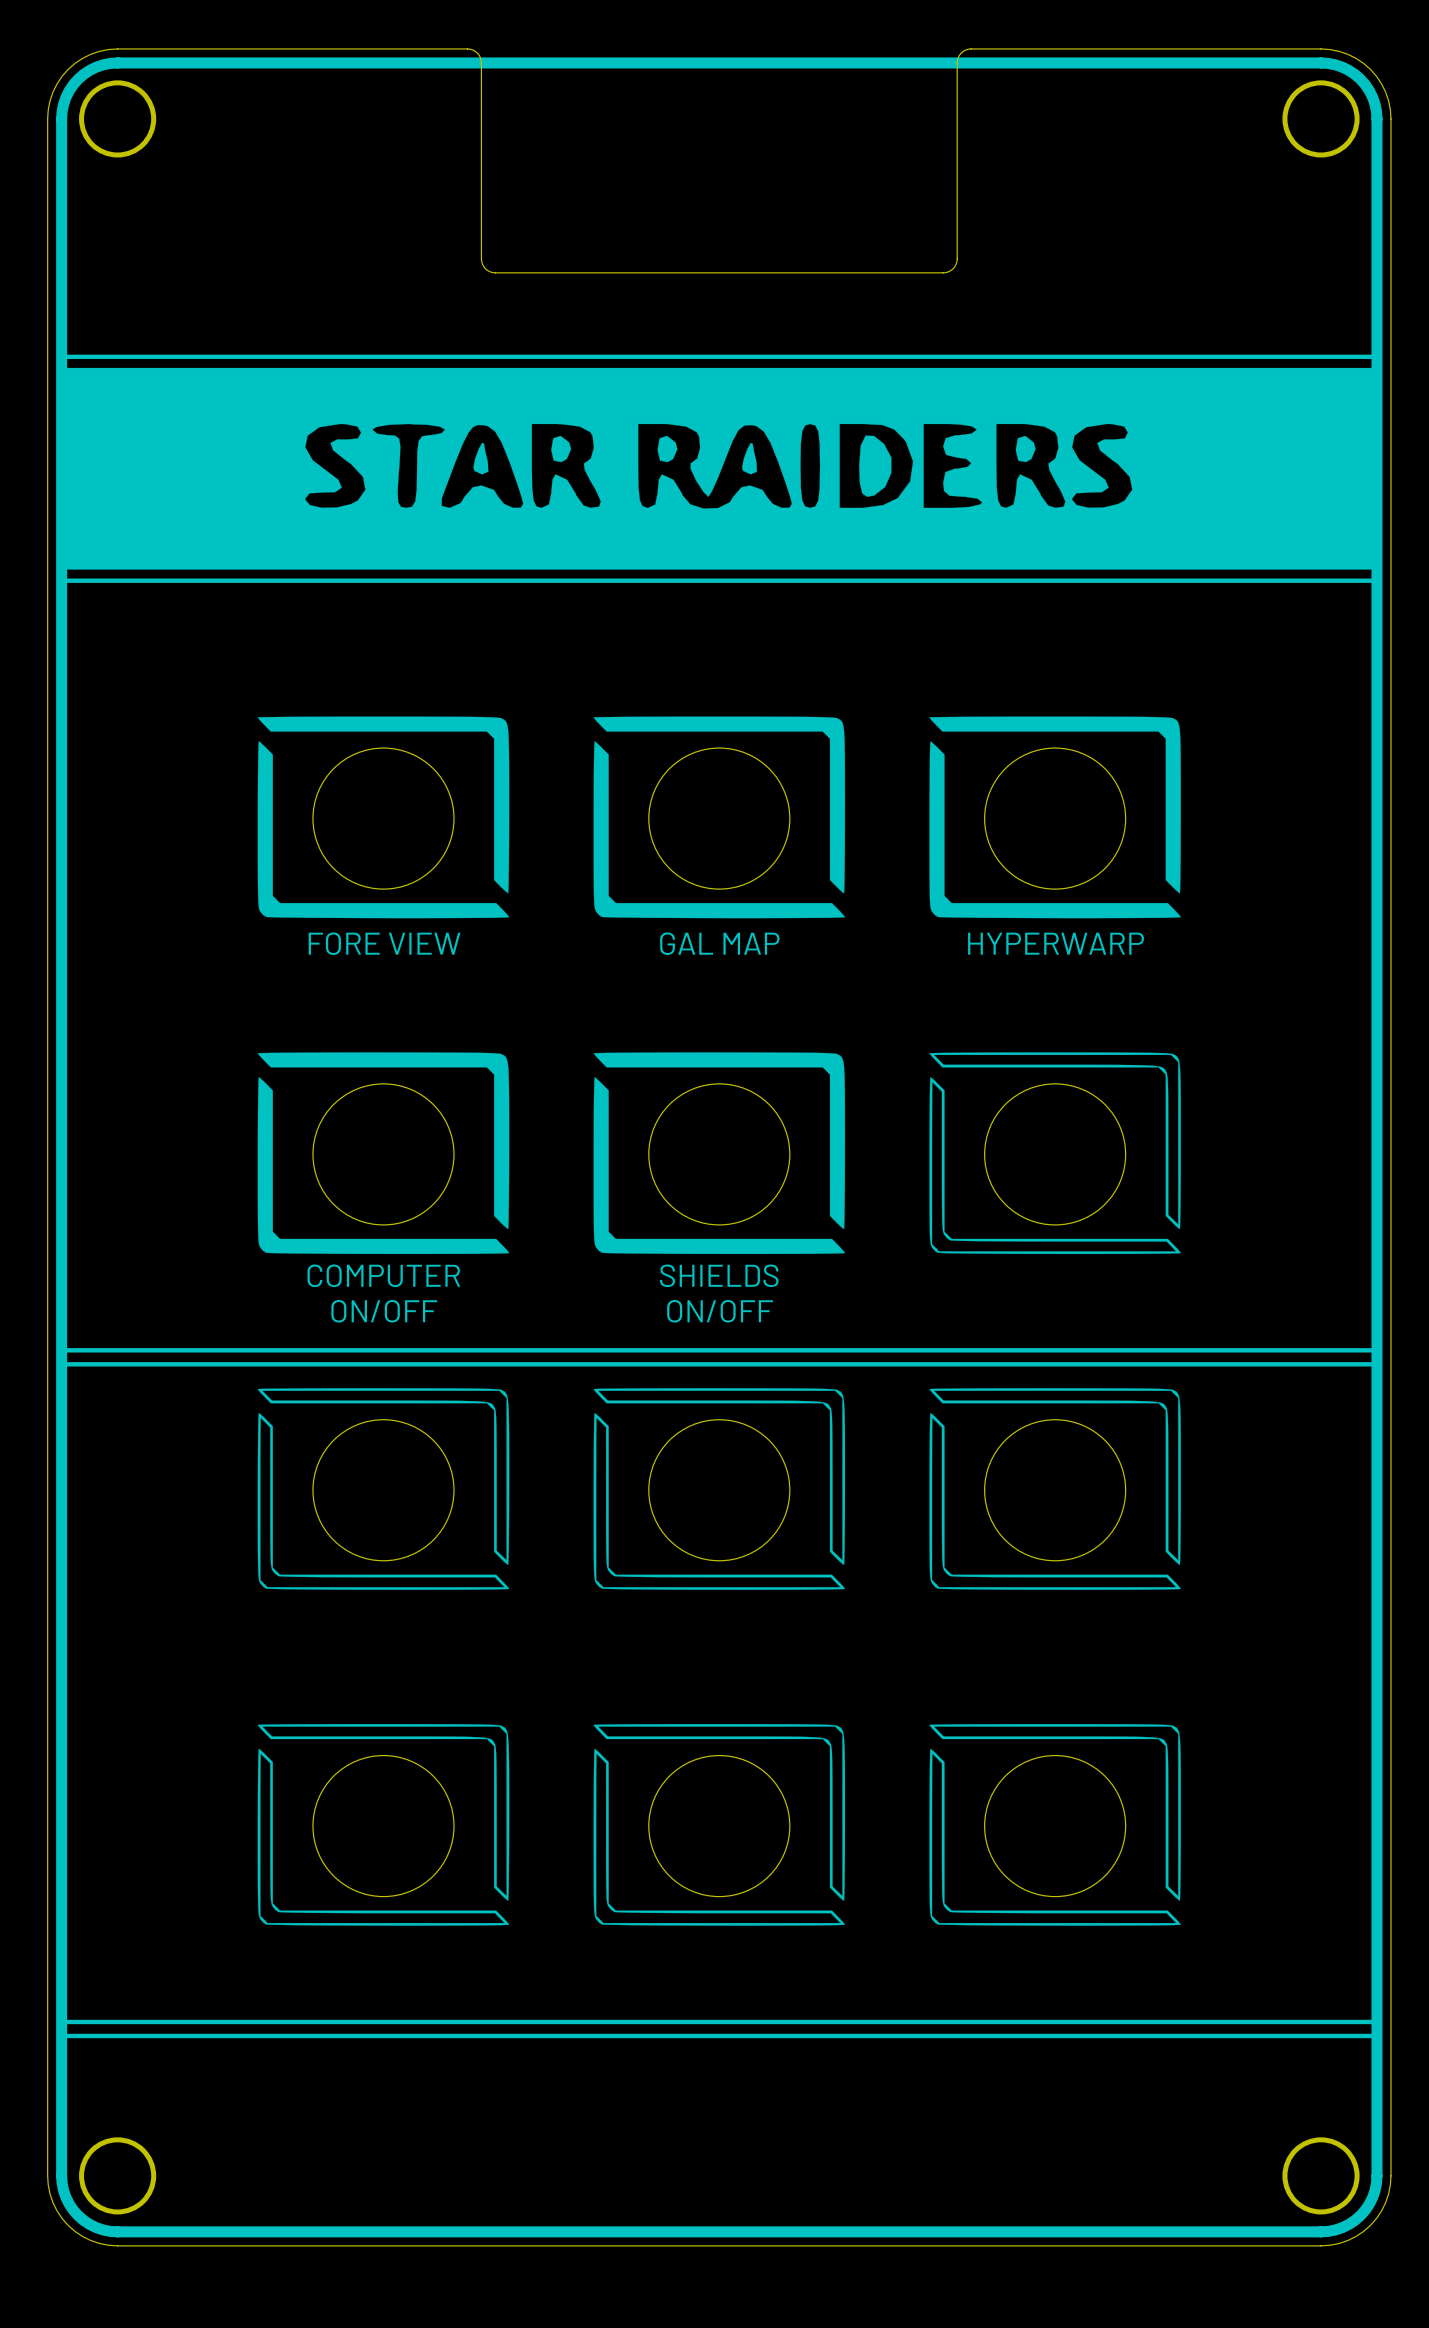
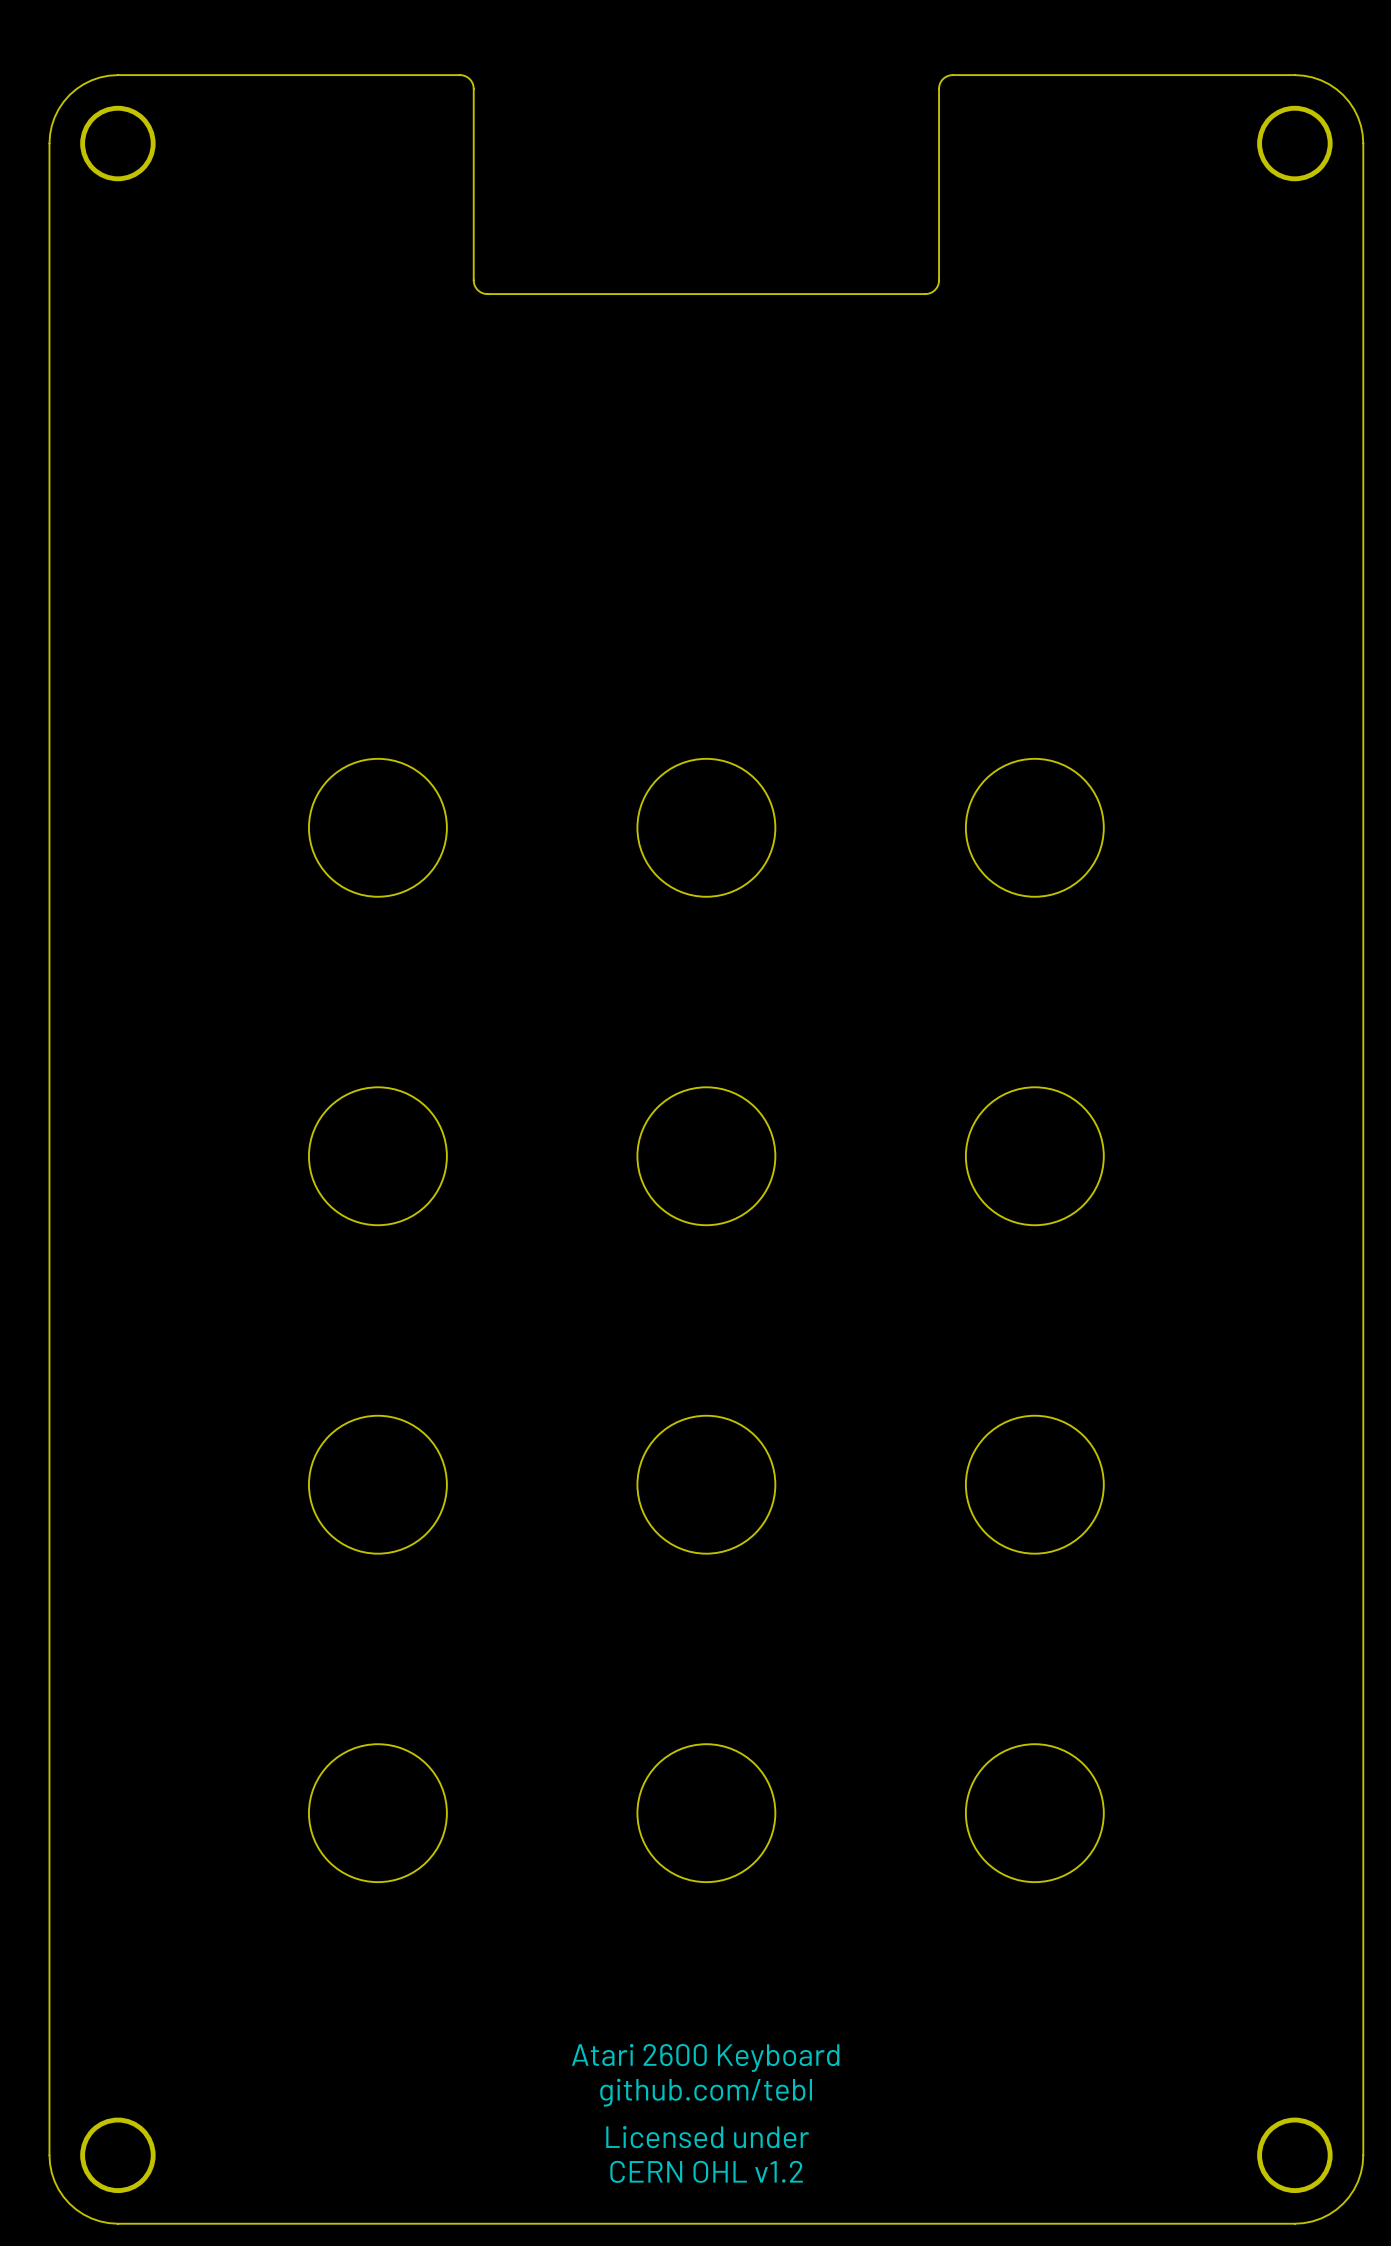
line: (1321, 62) (117, 62) (103, 64) (89, 70) (78, 79) (69, 90) (63, 104) (61, 118) (61, 2175) (63, 2190) (69, 2203) (78, 2215) (89, 2224) (103, 2229) (117, 2231) (1321, 2231) (1335, 2229) (1349, 2224) (1360, 2215) (1369, 2203) (1375, 2190) (1376, 2175) (1376, 118) (1372, 97) (1360, 79) (1342, 67) (1321, 62) -> none
line: (1376, 356) (61, 356) -> none
drawing: [64, 367, 1375, 570] -> none
line: (1376, 580) (61, 580) -> none
drawing: [257, 716, 510, 919] -> none
drawing: [593, 716, 846, 919] -> none
drawing: [929, 716, 1181, 919] -> none
text: FORE VIEW (384, 943) -> none
text: GAL MAP (719, 943) -> none
text: HYPERWARP (1056, 943) -> none
drawing: [257, 1052, 510, 1255] -> none
drawing: [593, 1052, 846, 1255] -> none
drawing: [929, 1052, 1181, 1255] -> none
text: COMPUTER (383, 1275) -> none
text: SHIELDS (719, 1275) -> none
text: ON/OFF (384, 1311) -> none
text: ON/OFF (720, 1311) -> none
line: (1376, 1350) (61, 1350) -> none
line: (1376, 1364) (61, 1364) -> none
drawing: [257, 1388, 510, 1590] -> none
drawing: [593, 1388, 846, 1590] -> none
drawing: [929, 1388, 1181, 1590] -> none
drawing: [257, 1724, 510, 1926] -> none
drawing: [593, 1724, 846, 1926] -> none
drawing: [929, 1724, 1181, 1926] -> none
line: (1376, 2021) (61, 2021) -> none
line: (1376, 2035) (61, 2035) -> none
text: none -> Atari 2600 Keyboard (705, 2057)
text: none -> github.com/tebl (706, 2092)
text: none -> Licensed under (707, 2137)
text: none -> CERN OHL v1.2 (706, 2171)

